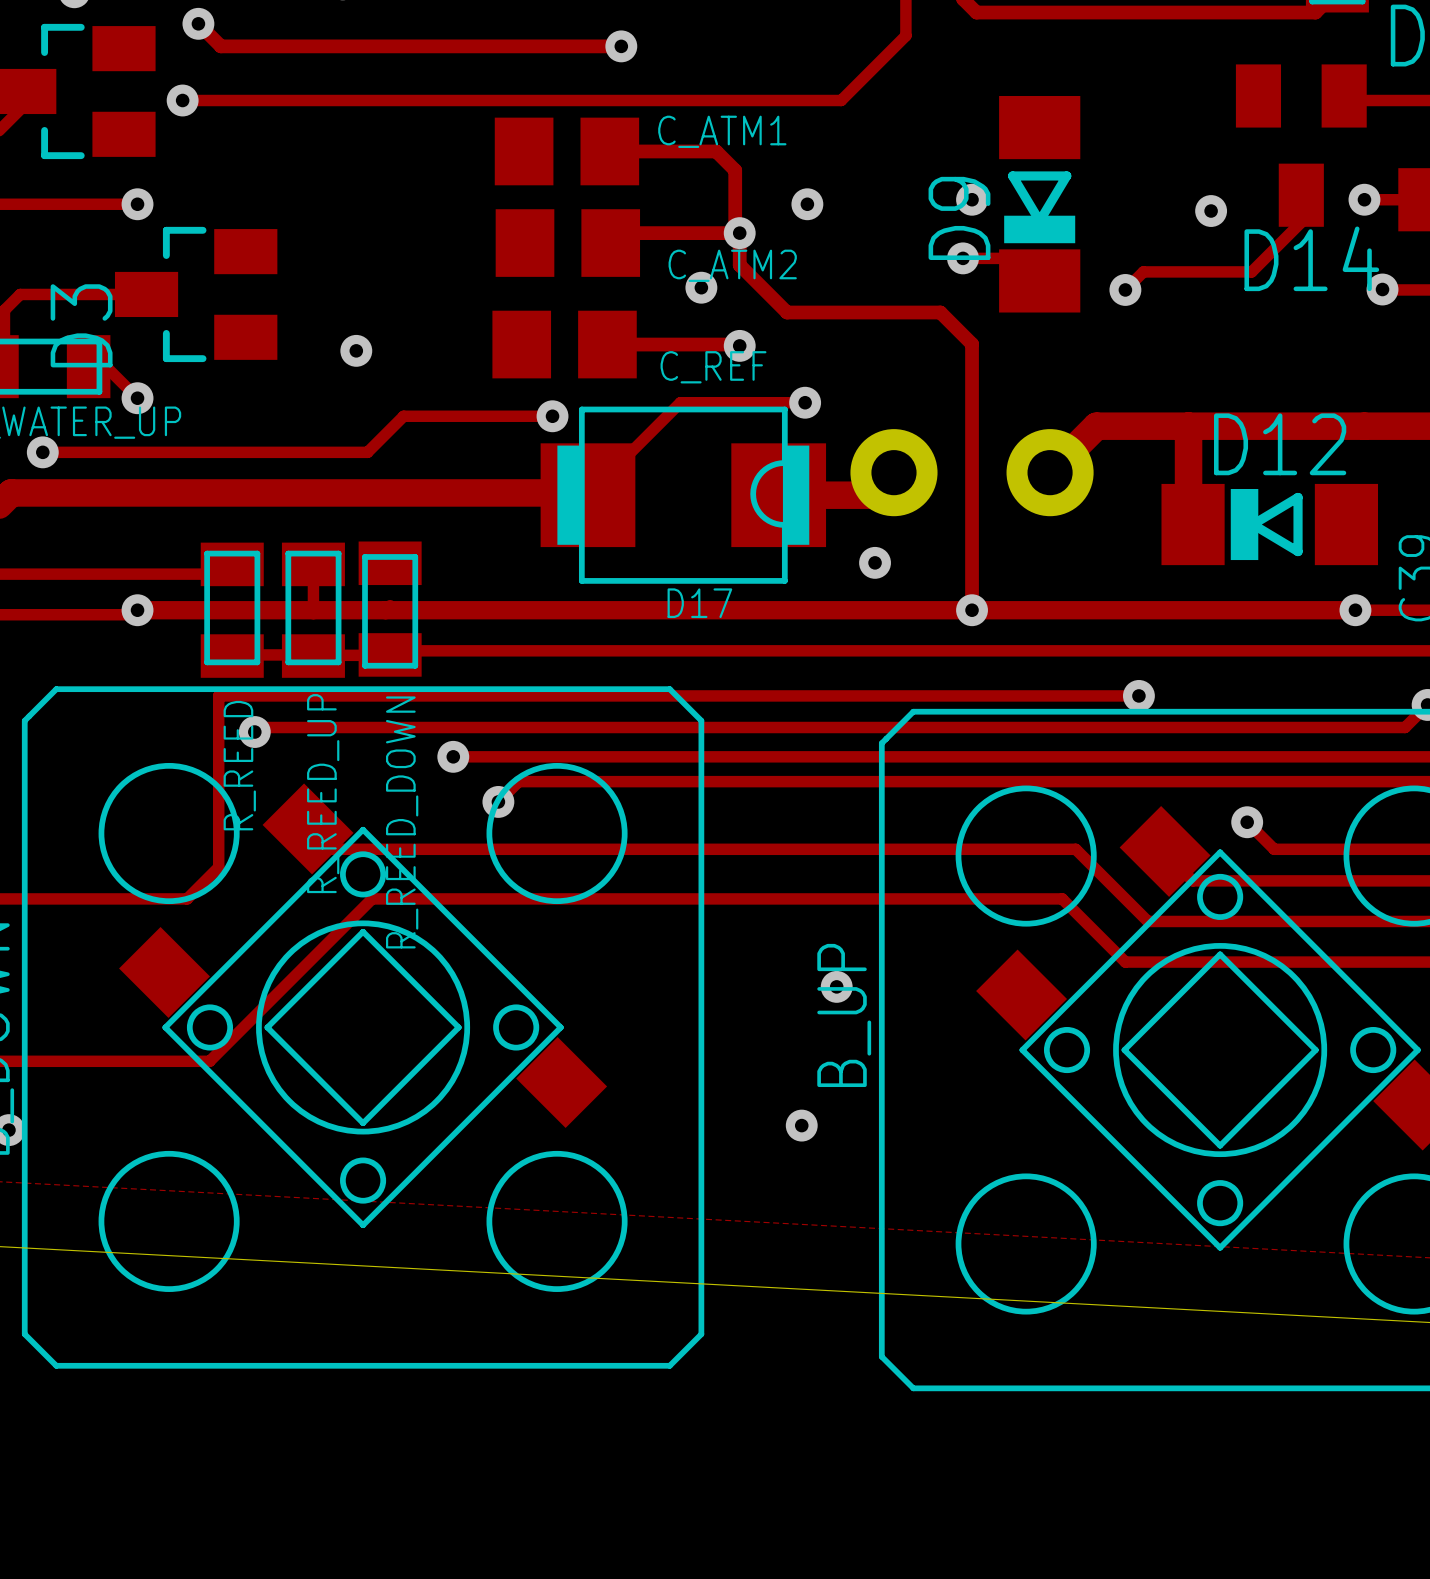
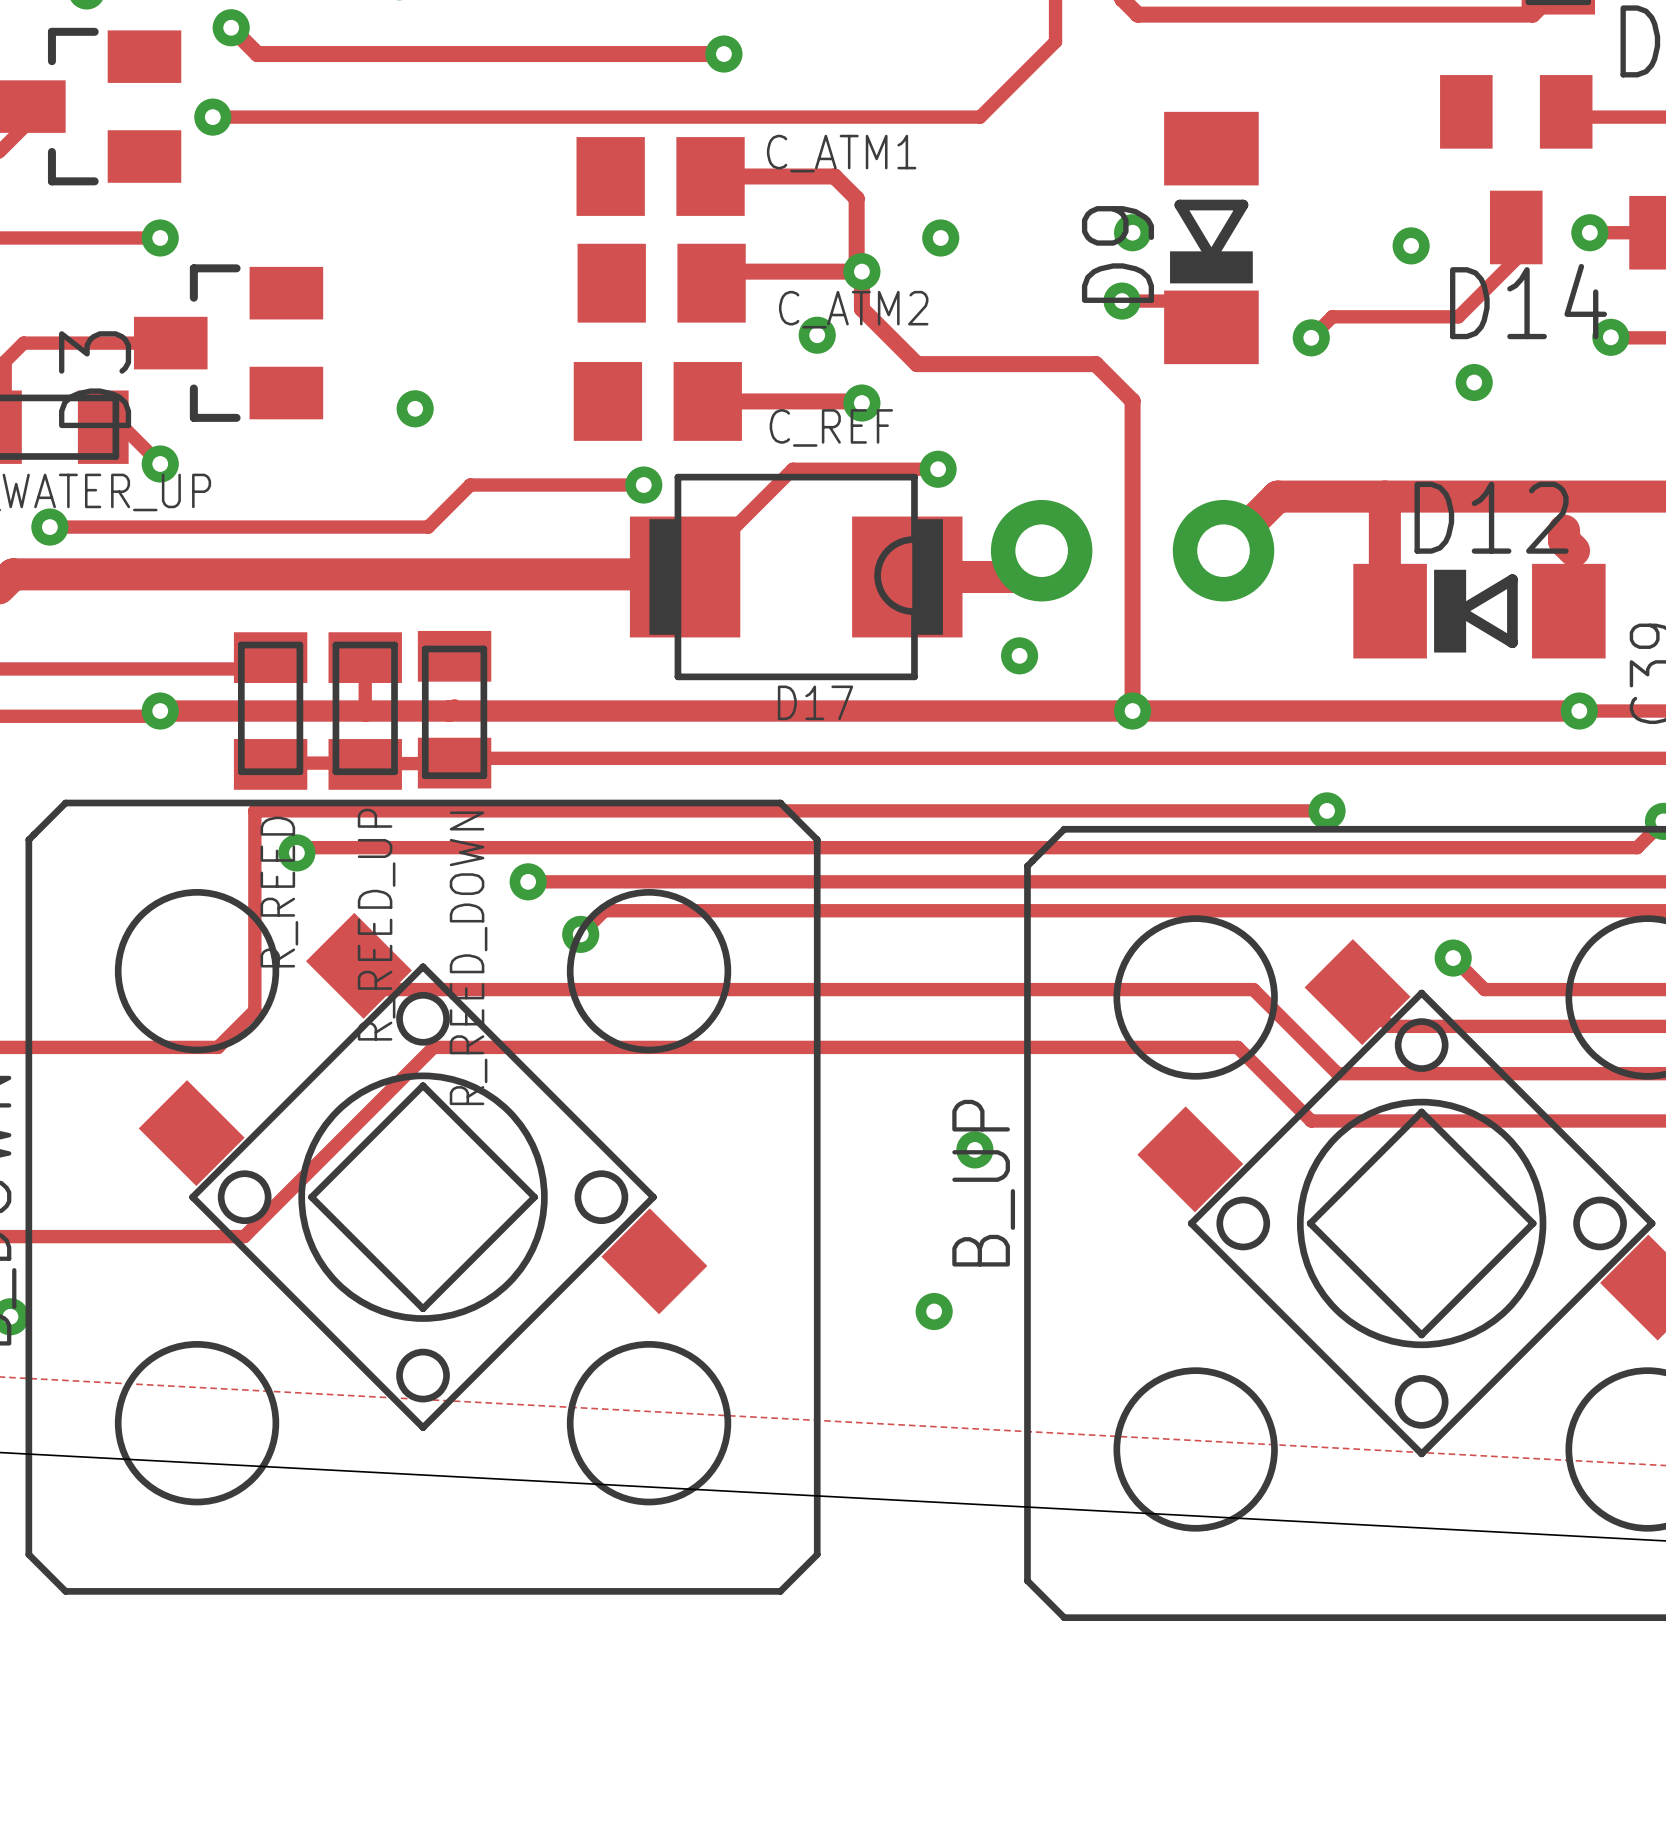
via: none -> (1474, 382)
track: none -> (1564, 530) (1564, 540) (1574, 550)

